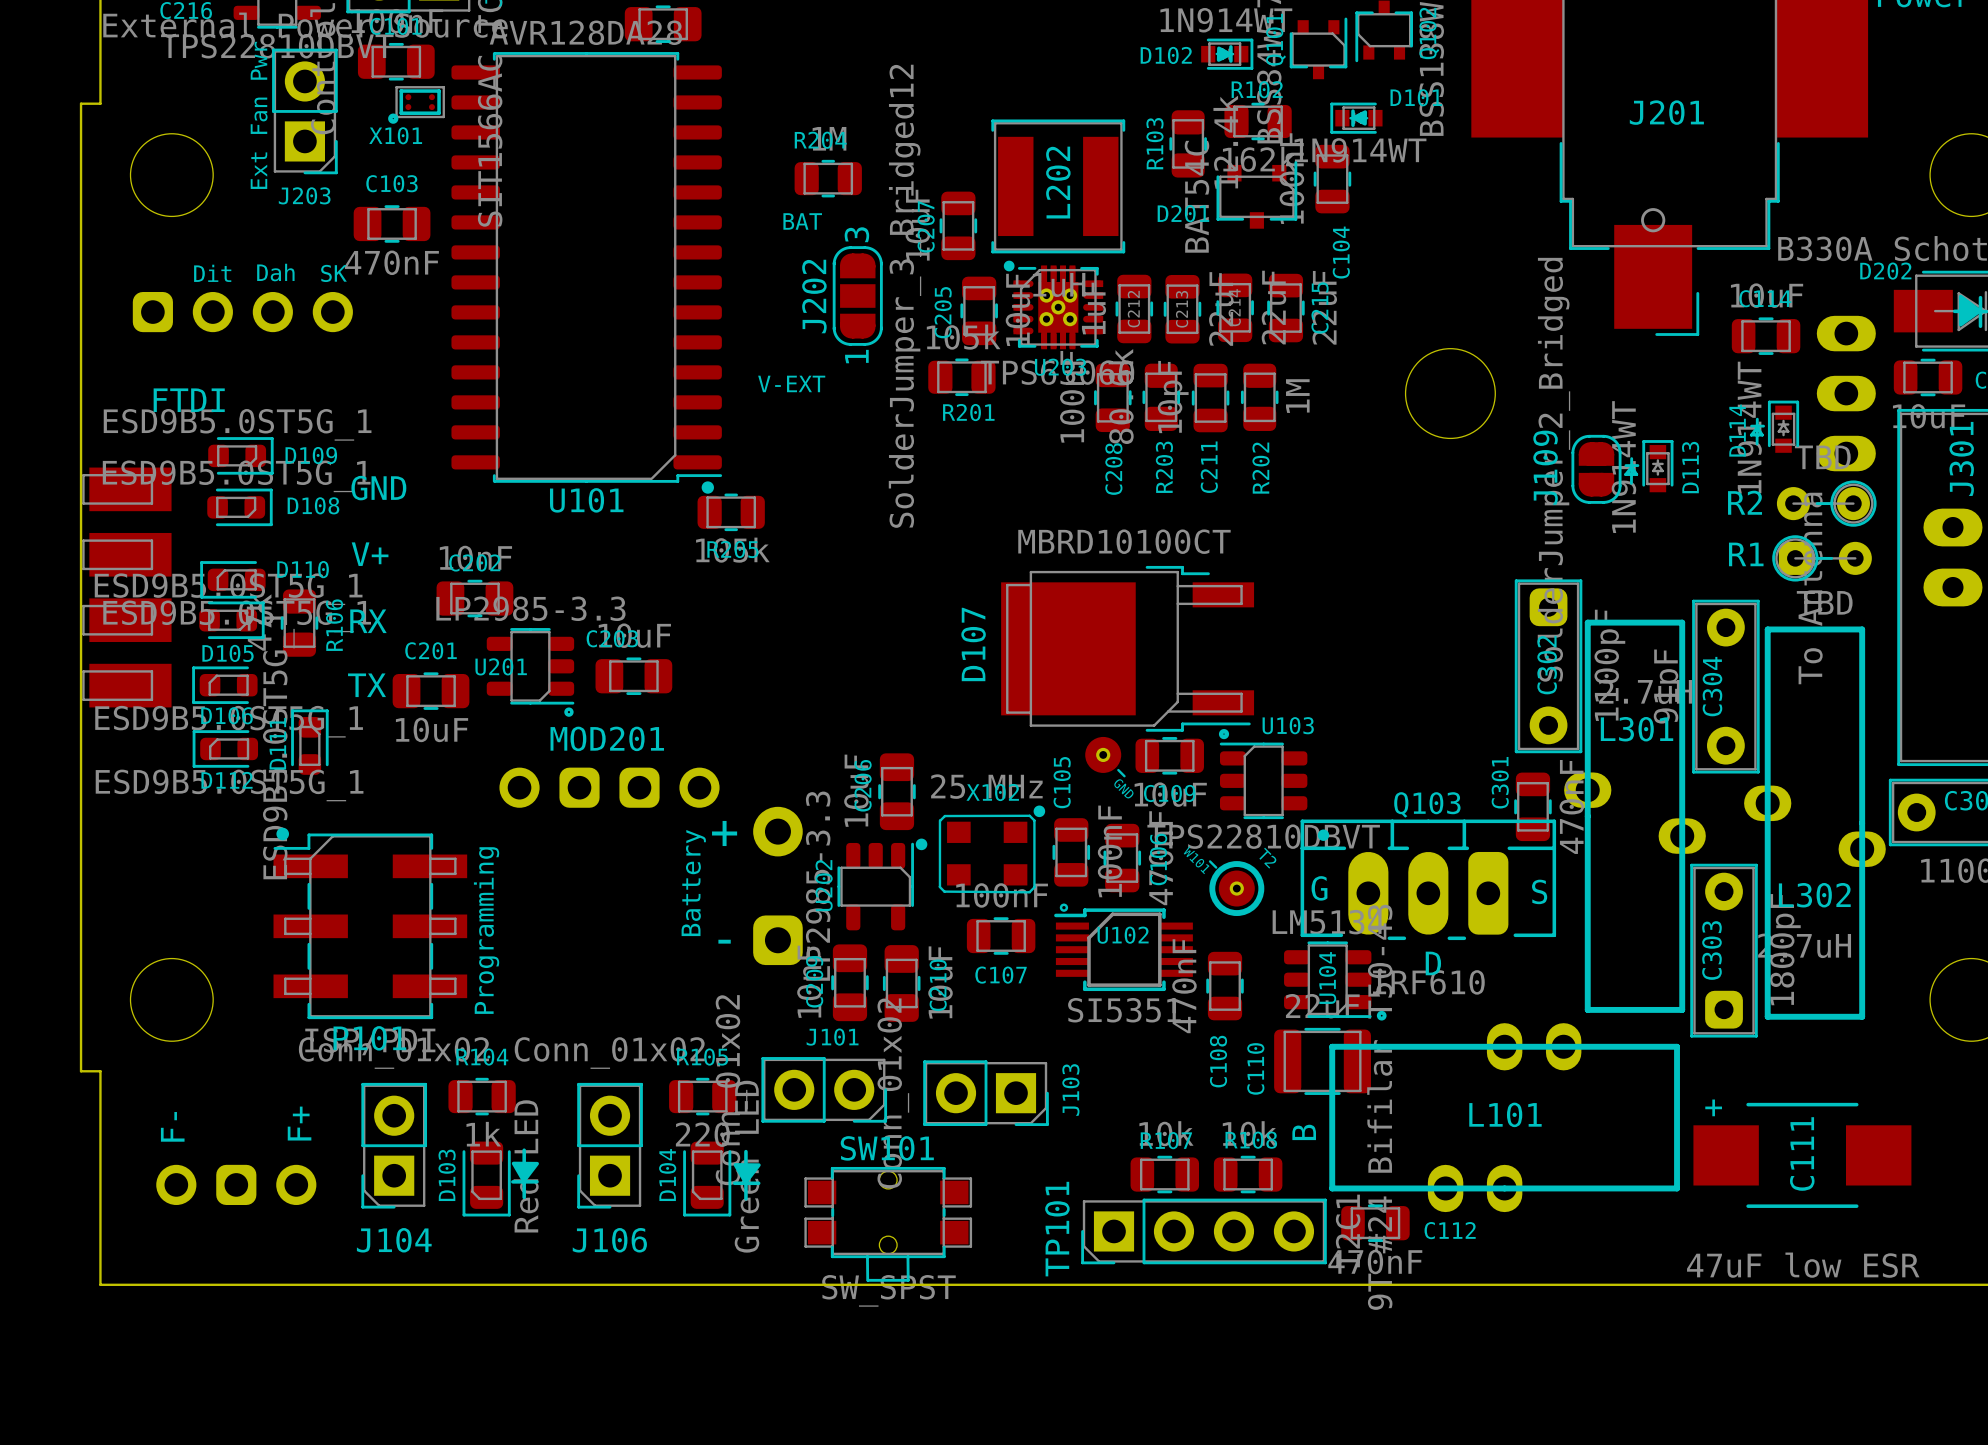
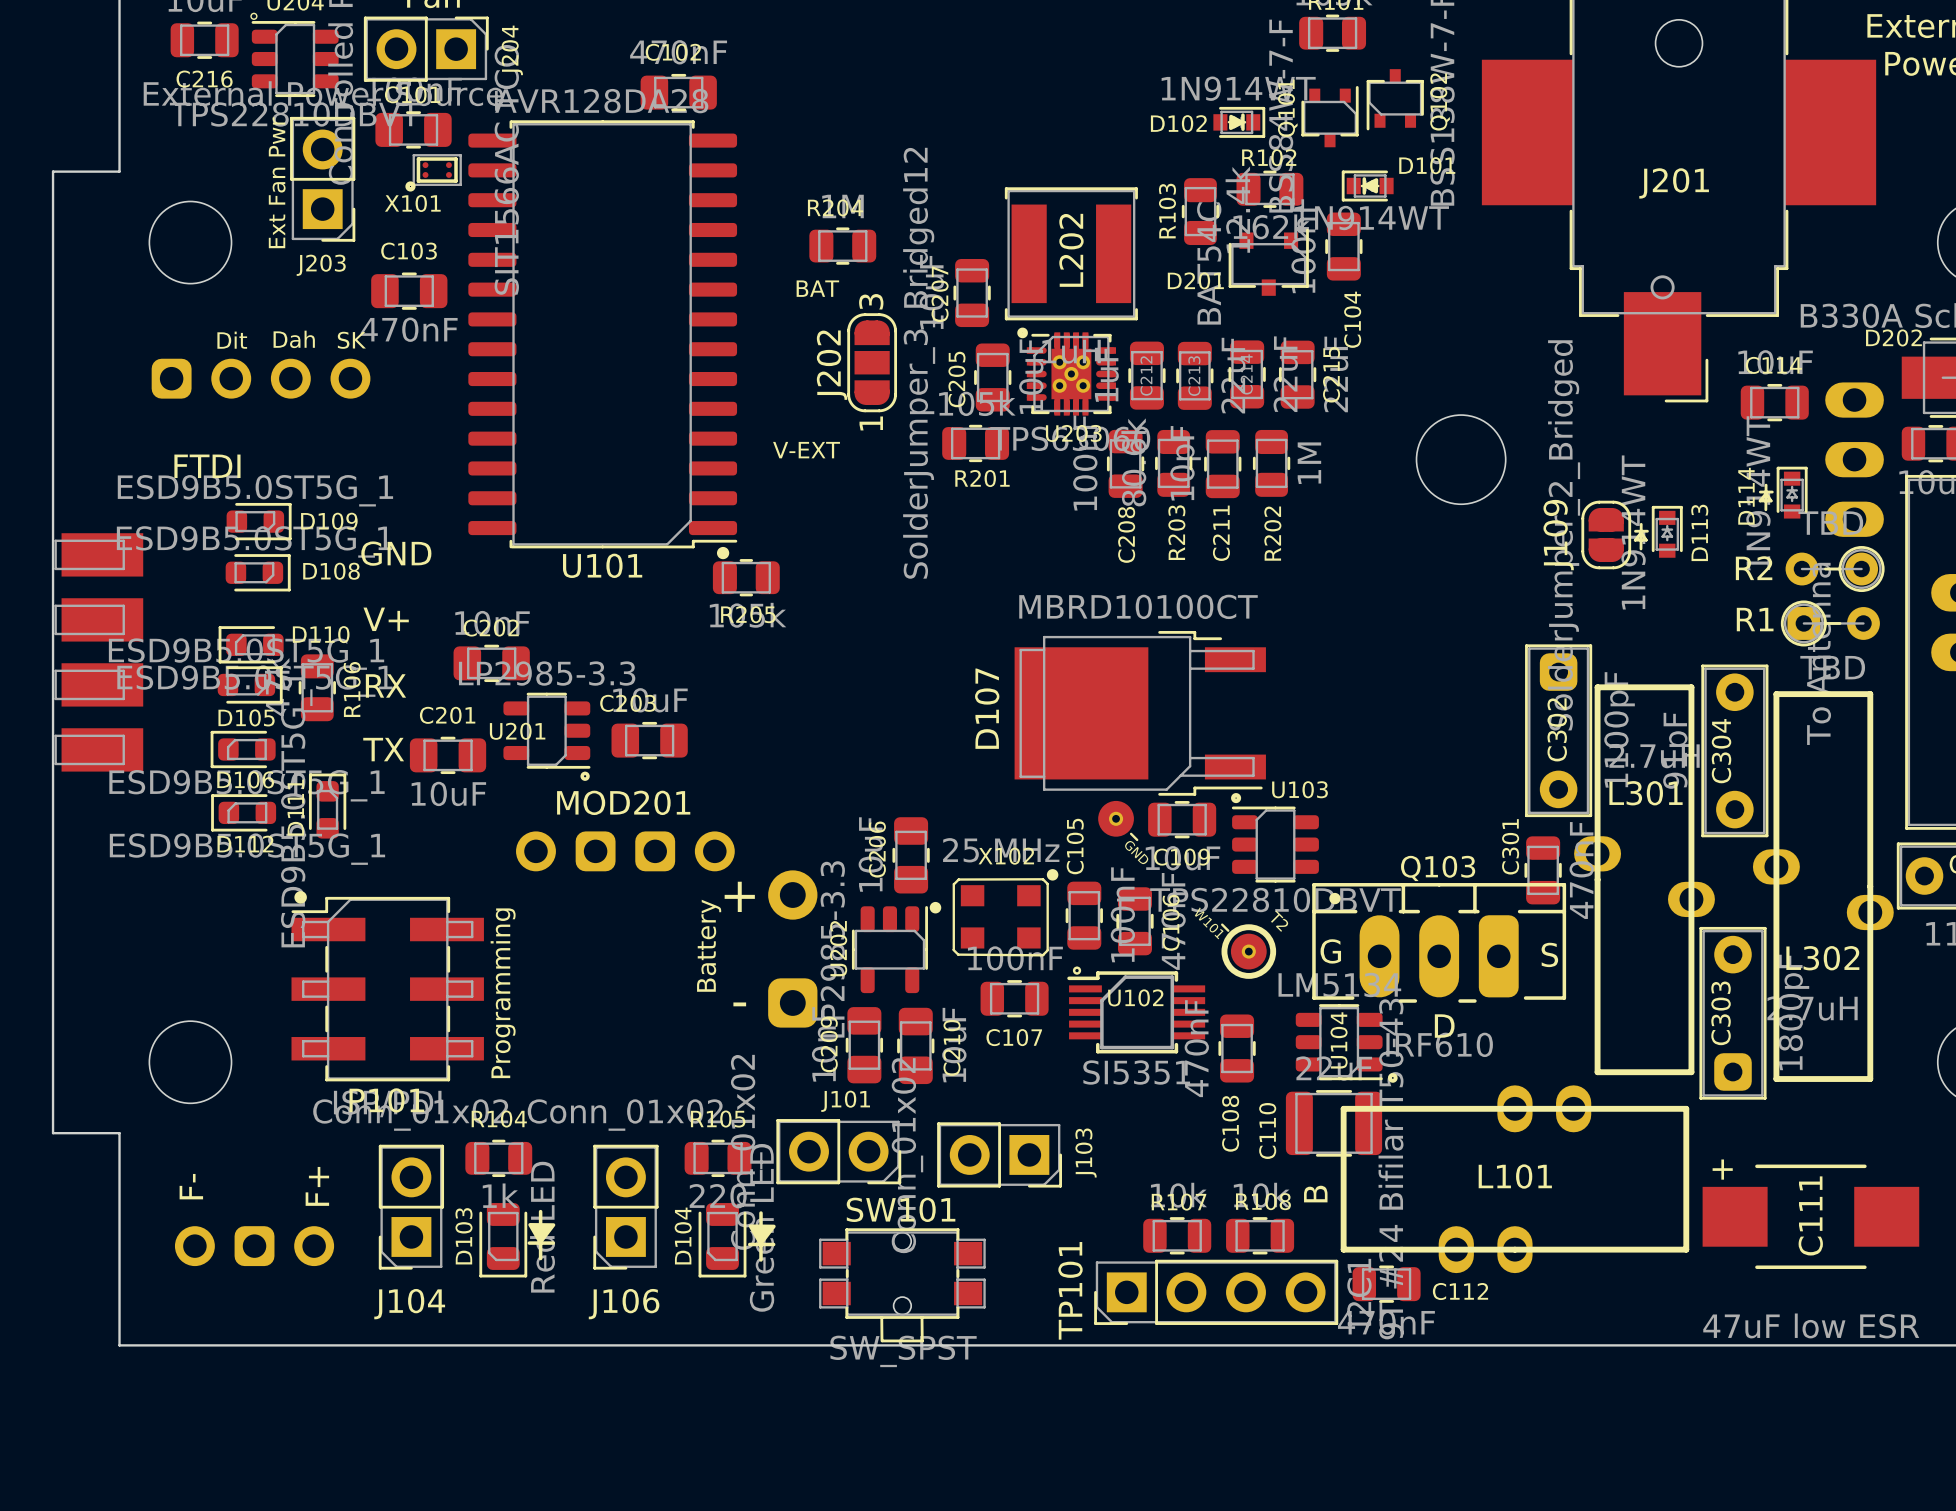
board edge: (81, 103) (81, 1071) -> (100, 171) (53, 171) (53, 1133) (100, 1133)
part position: (126, 587) -> (98, 652)

